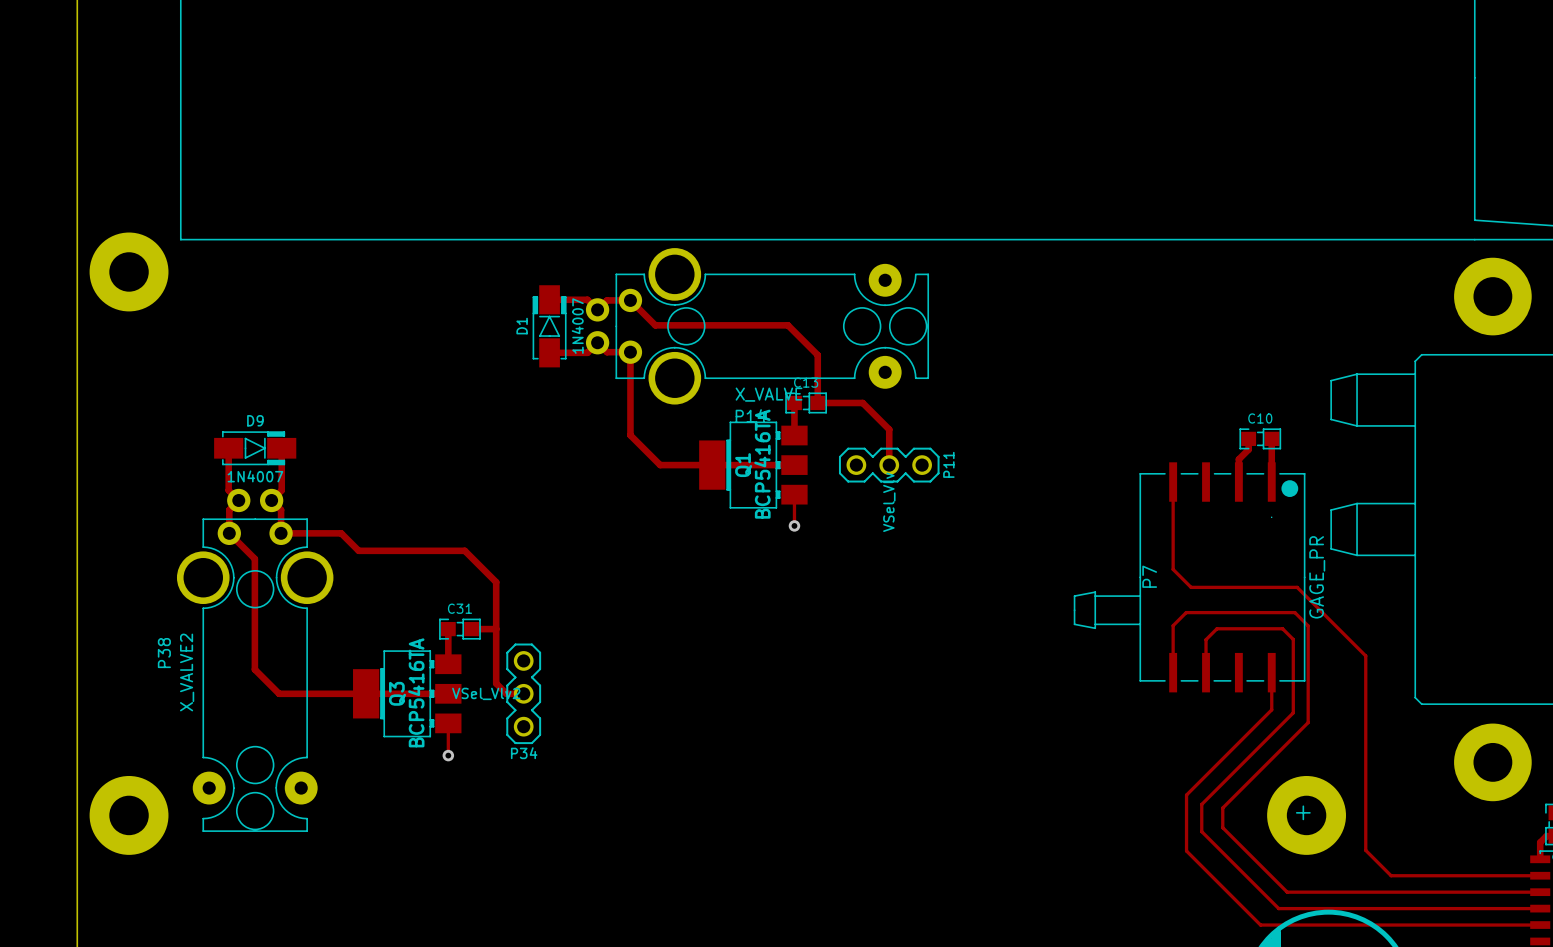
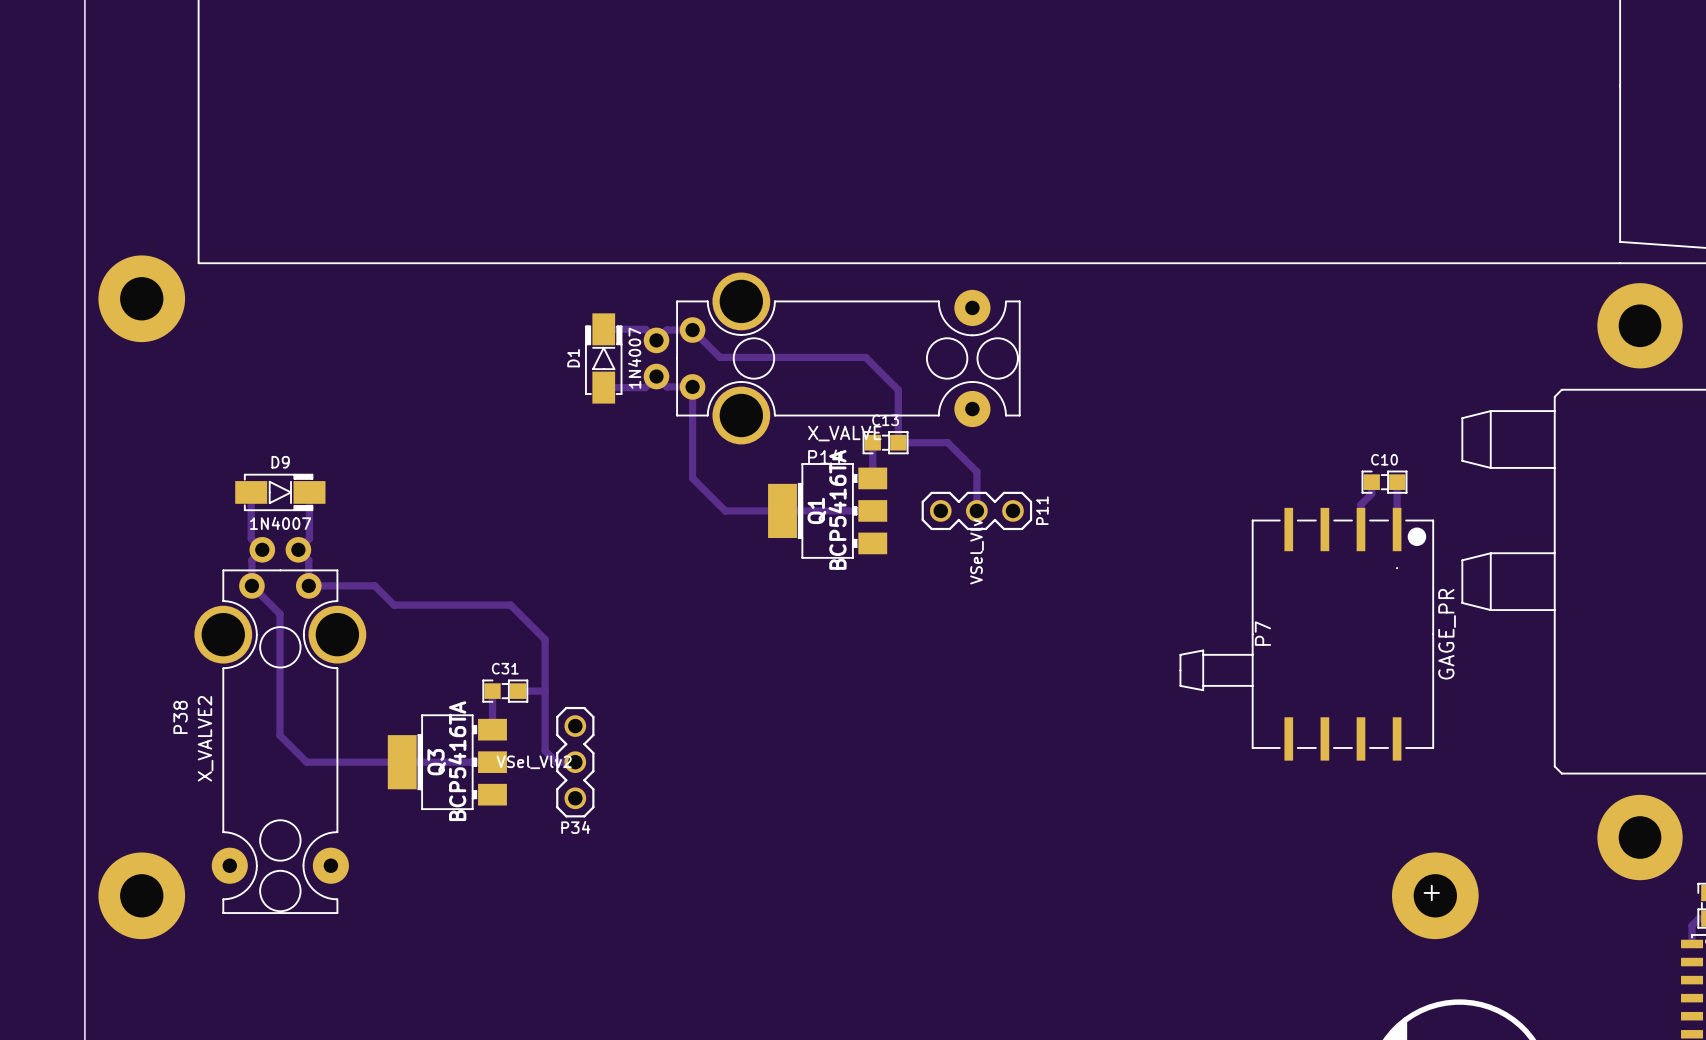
track: (1173, 482) (1173, 569) (1191, 587) (1297, 587) (1365, 655) (1365, 850) (1391, 875) (1540, 875) -> none
track: (794, 494) (794, 525) -> none
via: (794, 525) -> none
track: (1173, 672) (1173, 625) (1186, 612) (1294, 612) (1308, 625) (1308, 722) (1222, 808) (1222, 827) (1287, 892) (1540, 892) -> none
track: (1206, 672) (1206, 639) (1216, 628) (1282, 628) (1293, 639) (1293, 712) (1201, 804) (1201, 831) (1278, 908) (1540, 908) -> none
track: (1271, 672) (1271, 709) (1186, 795) (1186, 851) (1260, 925) (1540, 925) -> none
track: (448, 723) (448, 755) -> none
via: (448, 755) -> none

